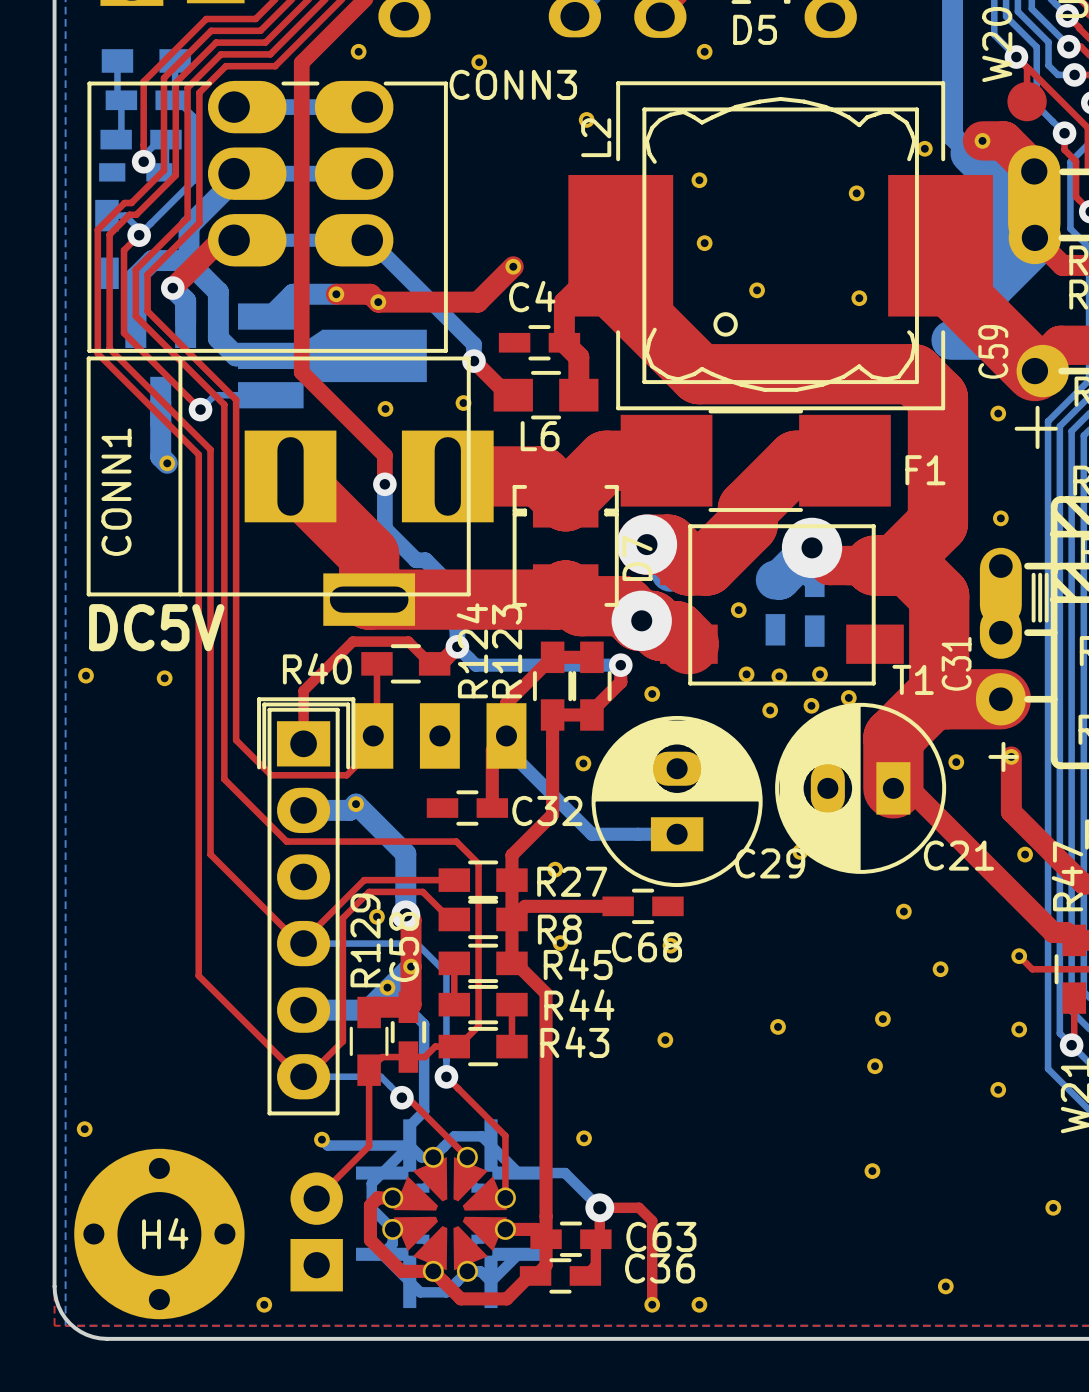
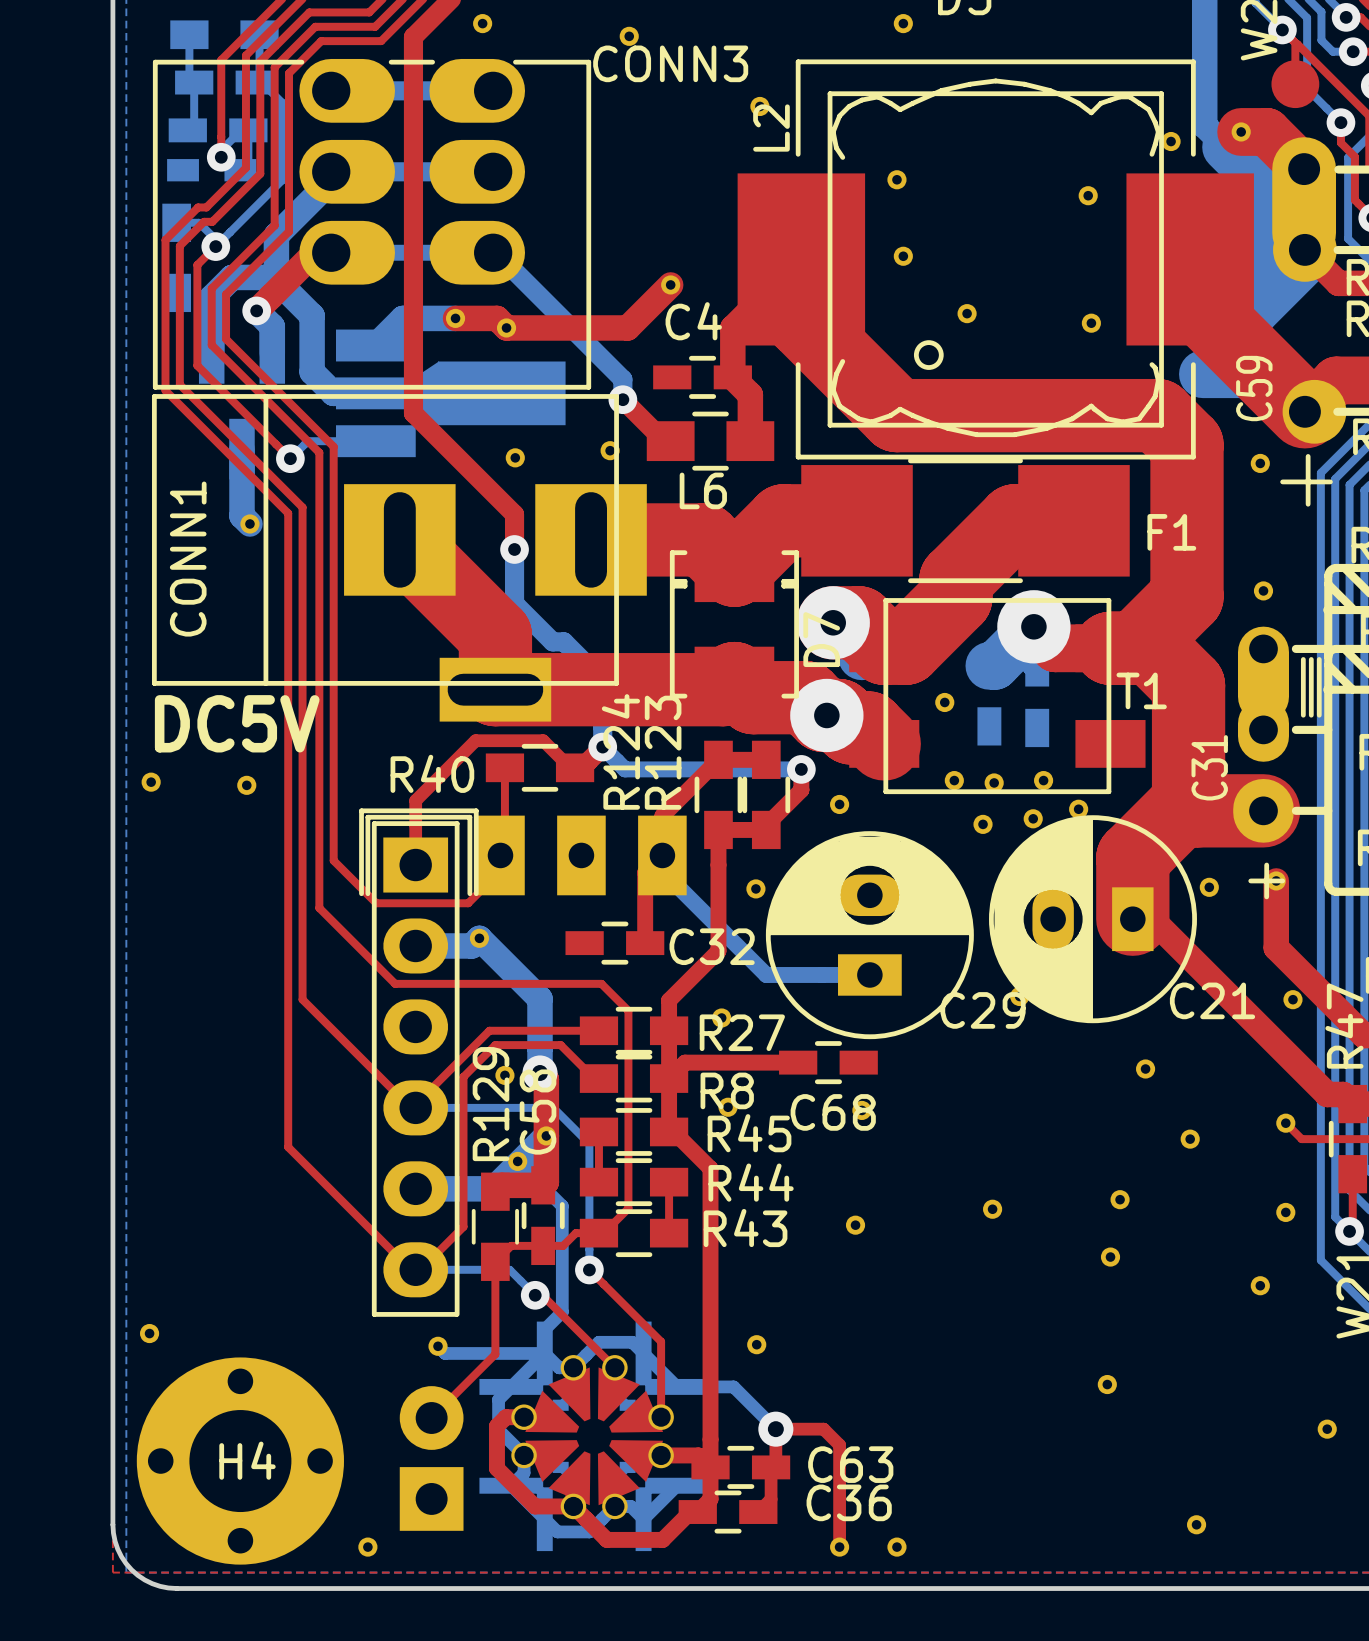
T1 name position: T1 (913, 679) -> T1 (1141, 690)

